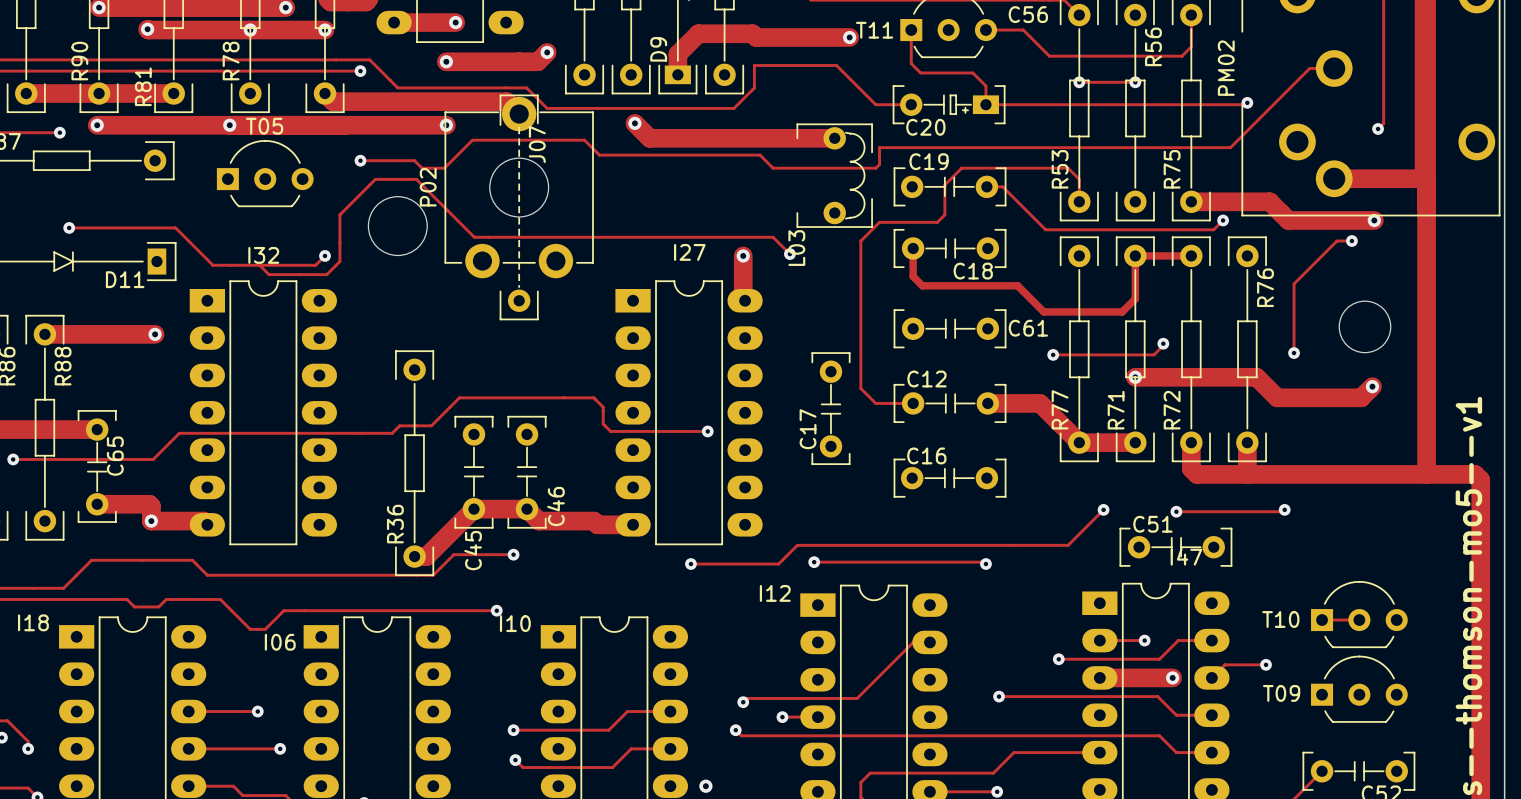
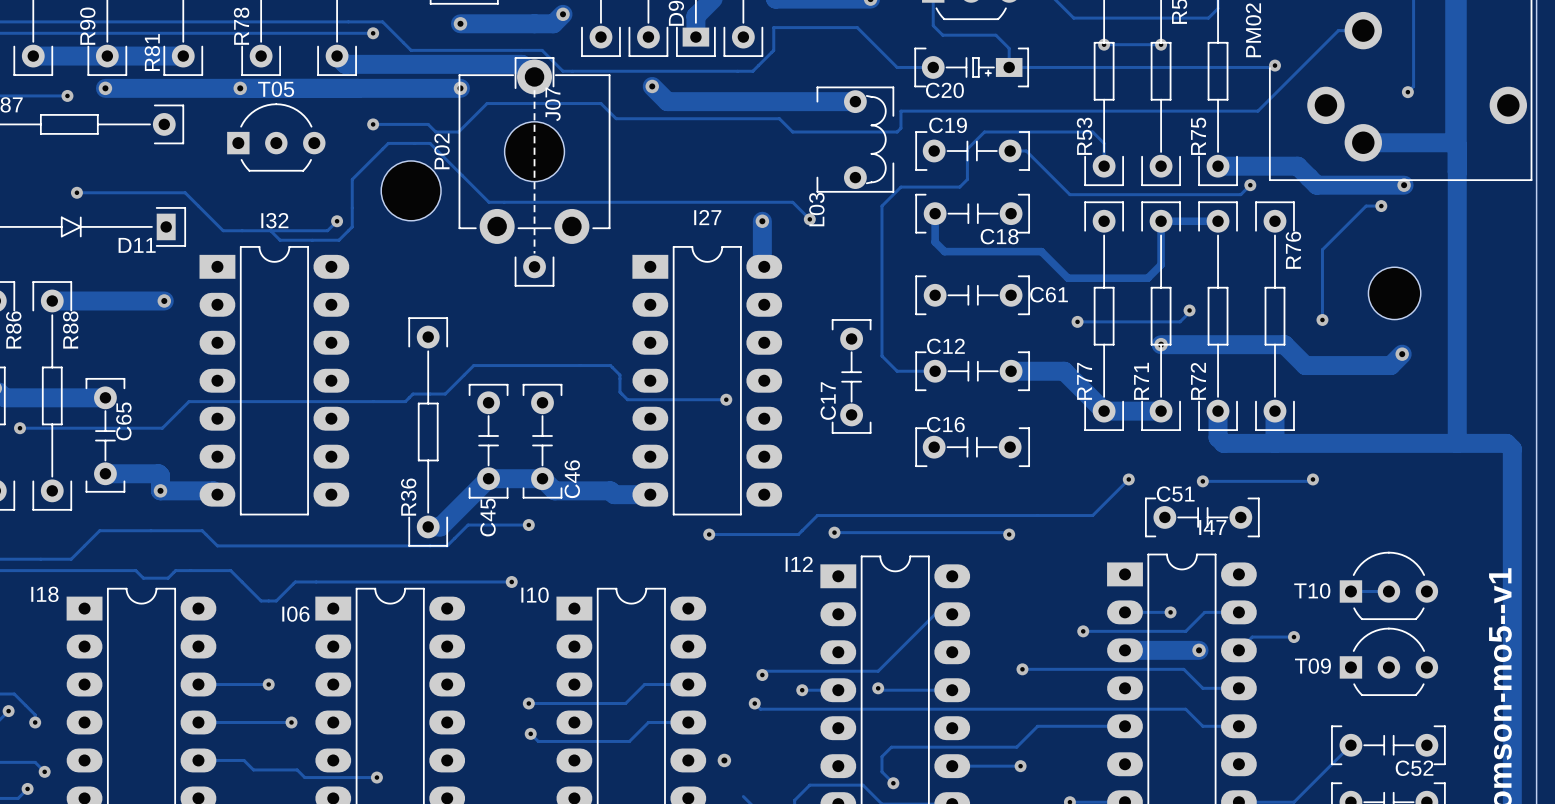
track: none -> (878, 688) (880, 690) (952, 690)
via: none -> (878, 688)

